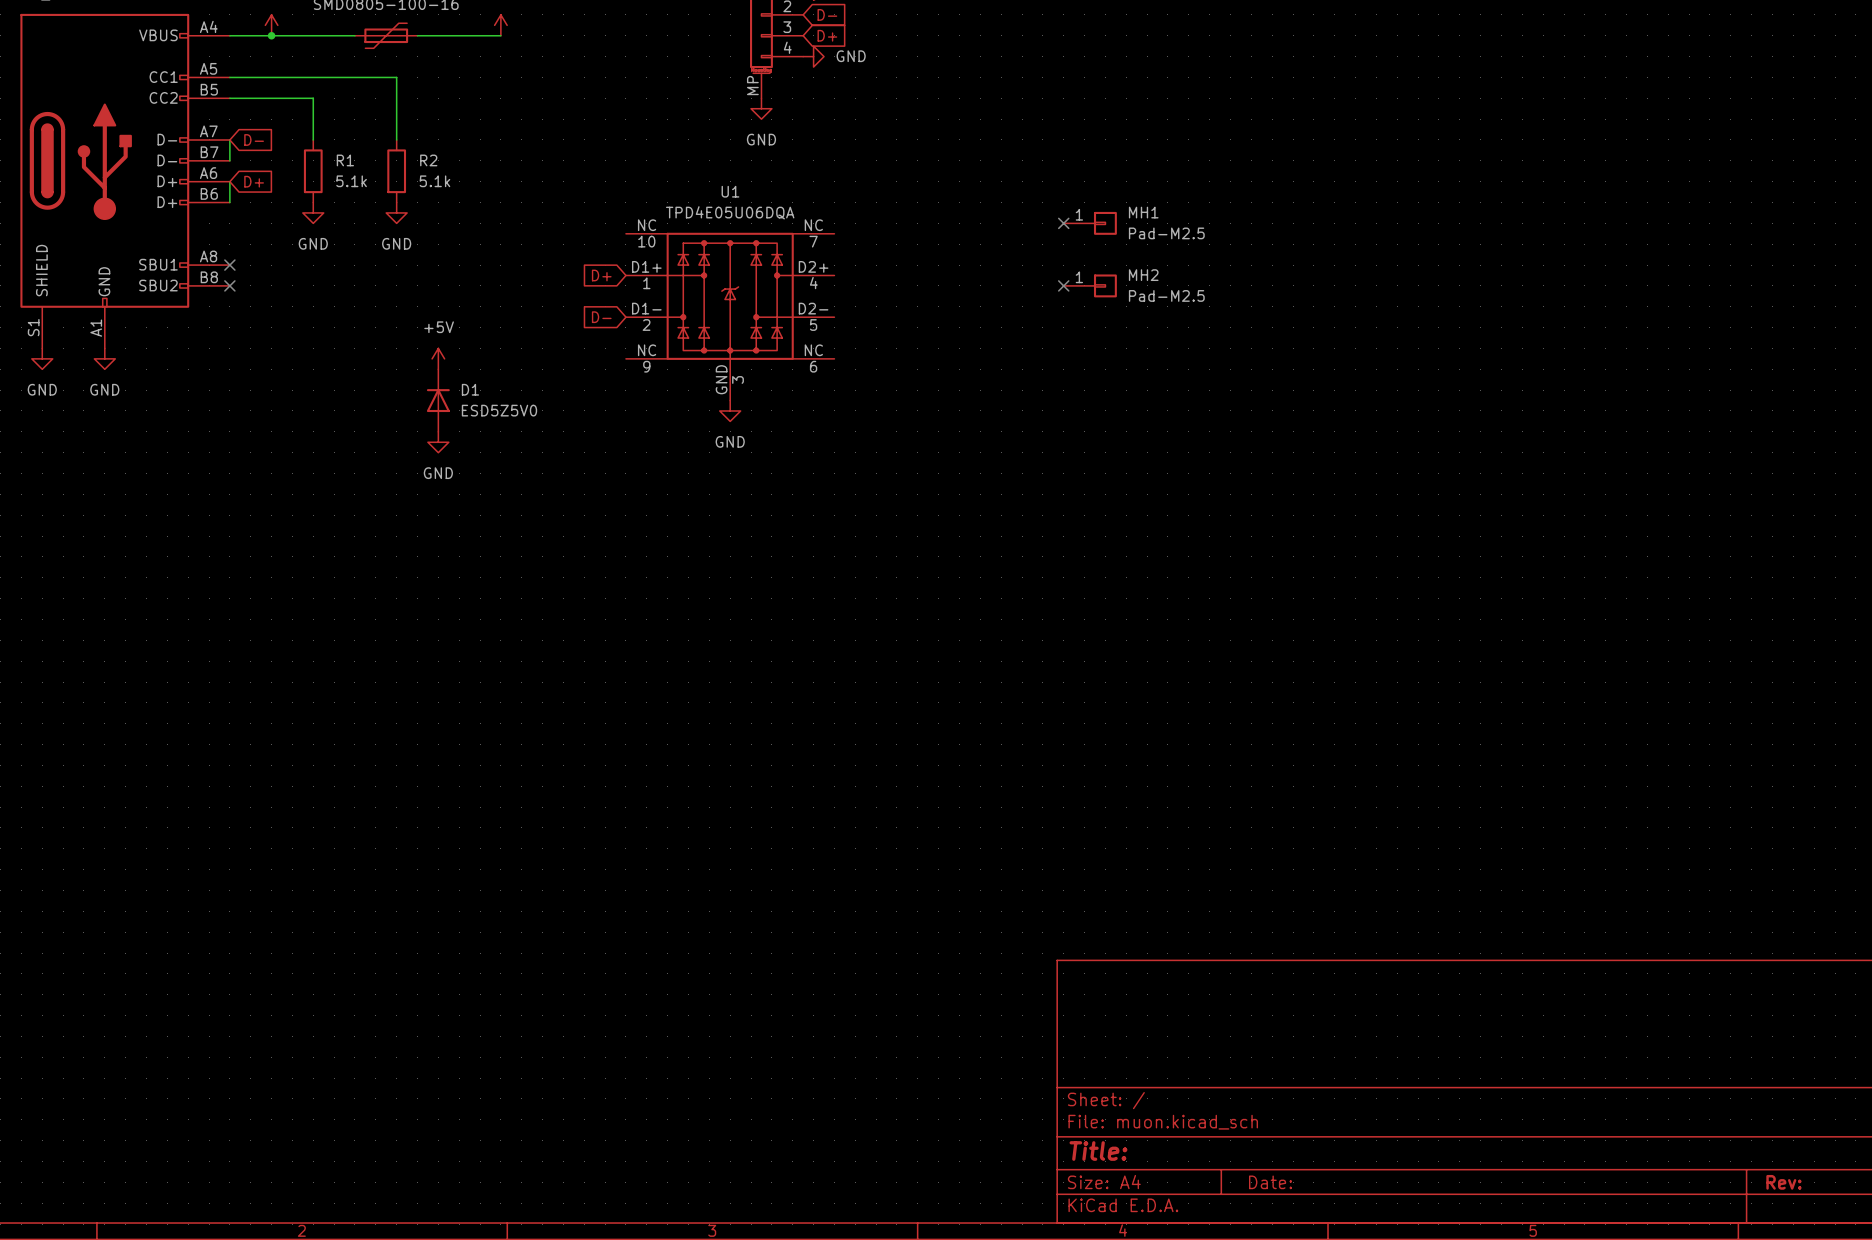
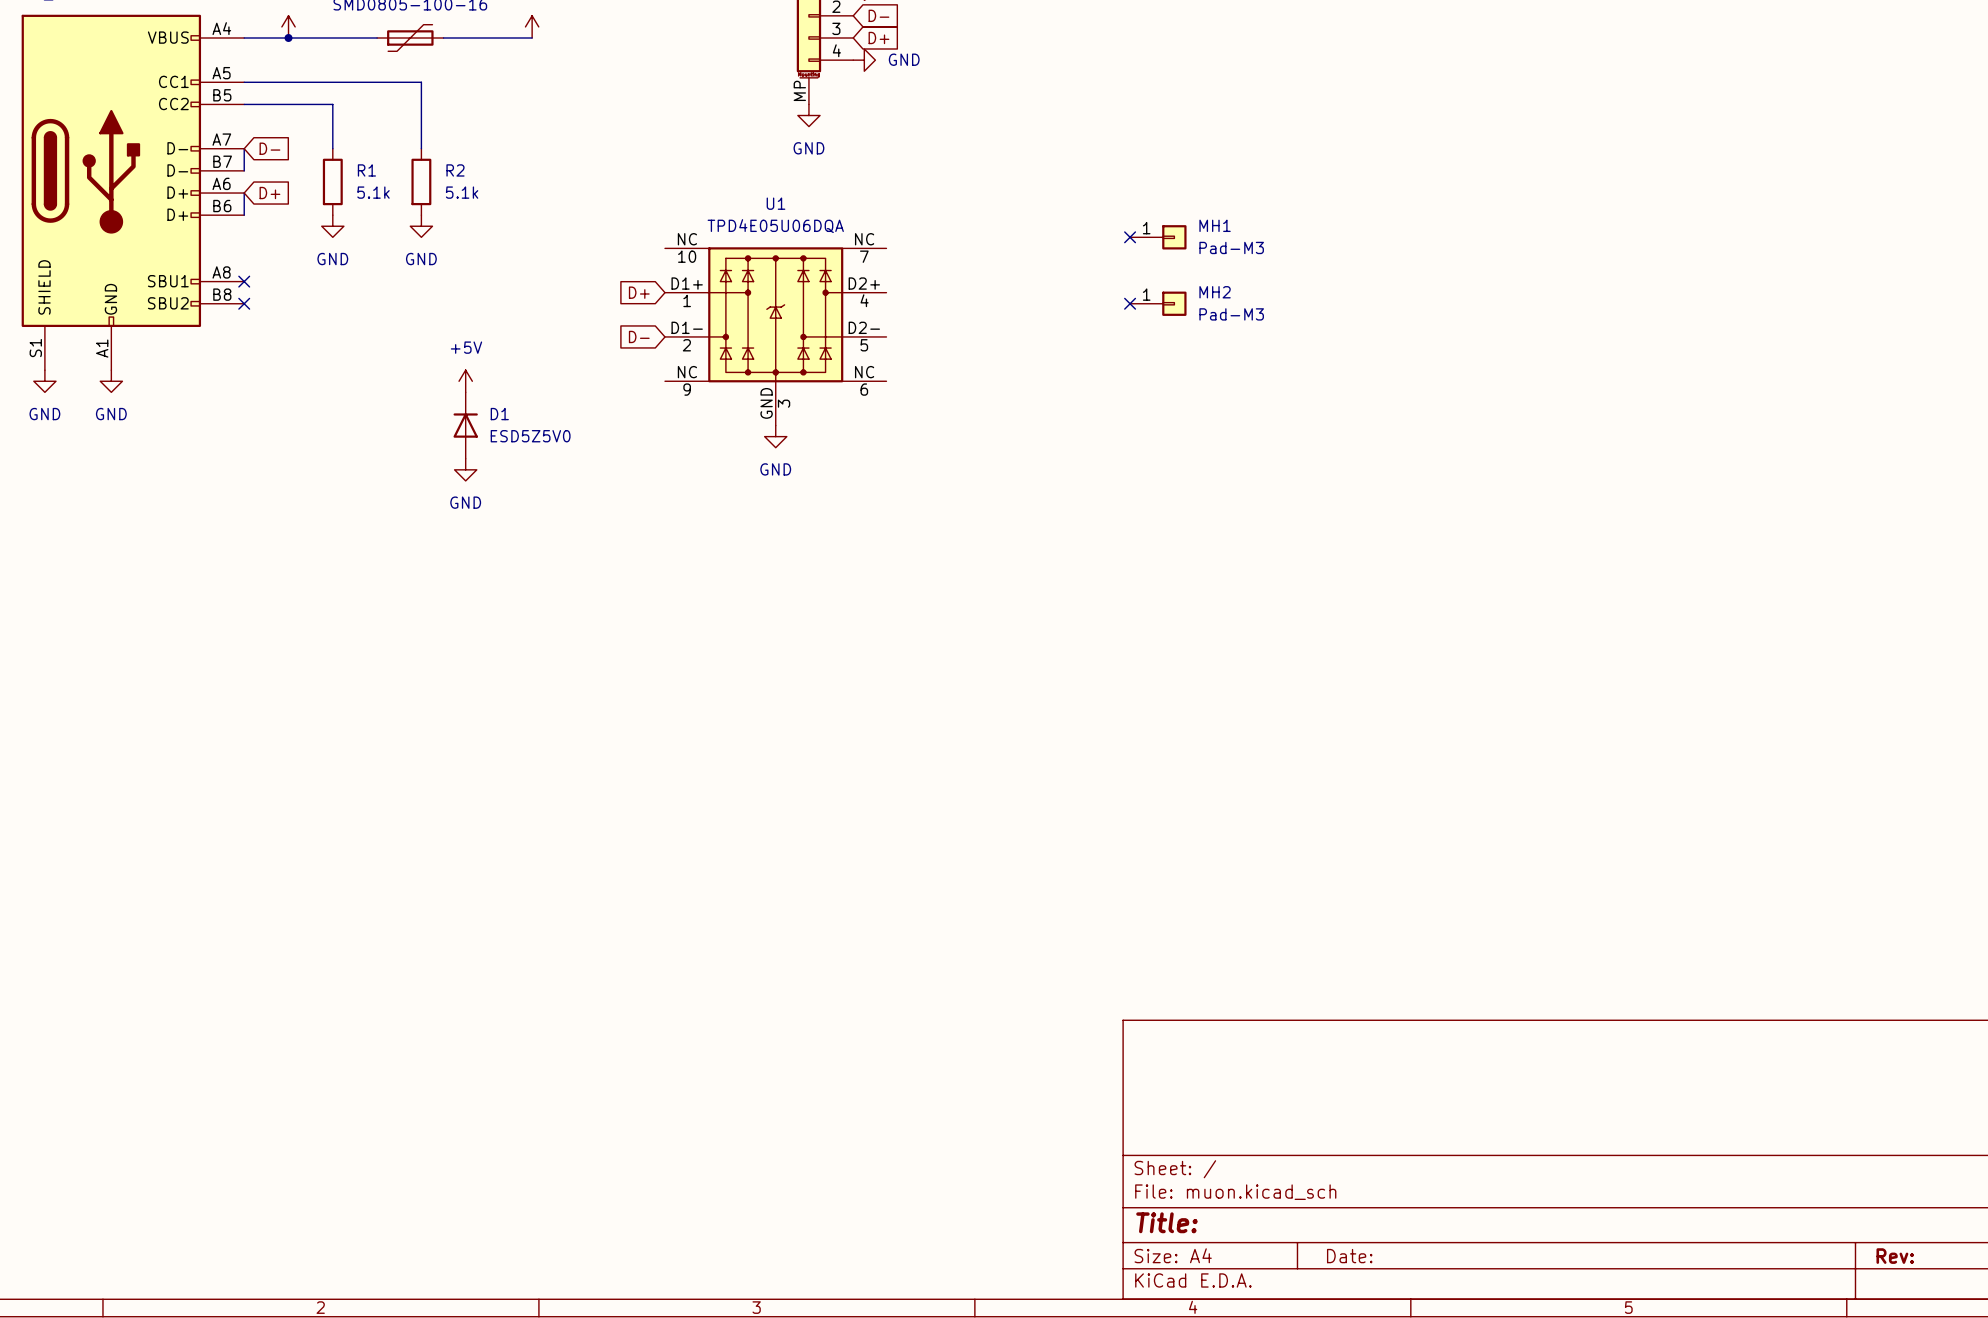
MH1 value: Pad-M2.5 (1166, 233) -> Pad-M3 (1231, 247)
MH2 value: Pad-M2.5 (1166, 295) -> Pad-M3 (1231, 314)

